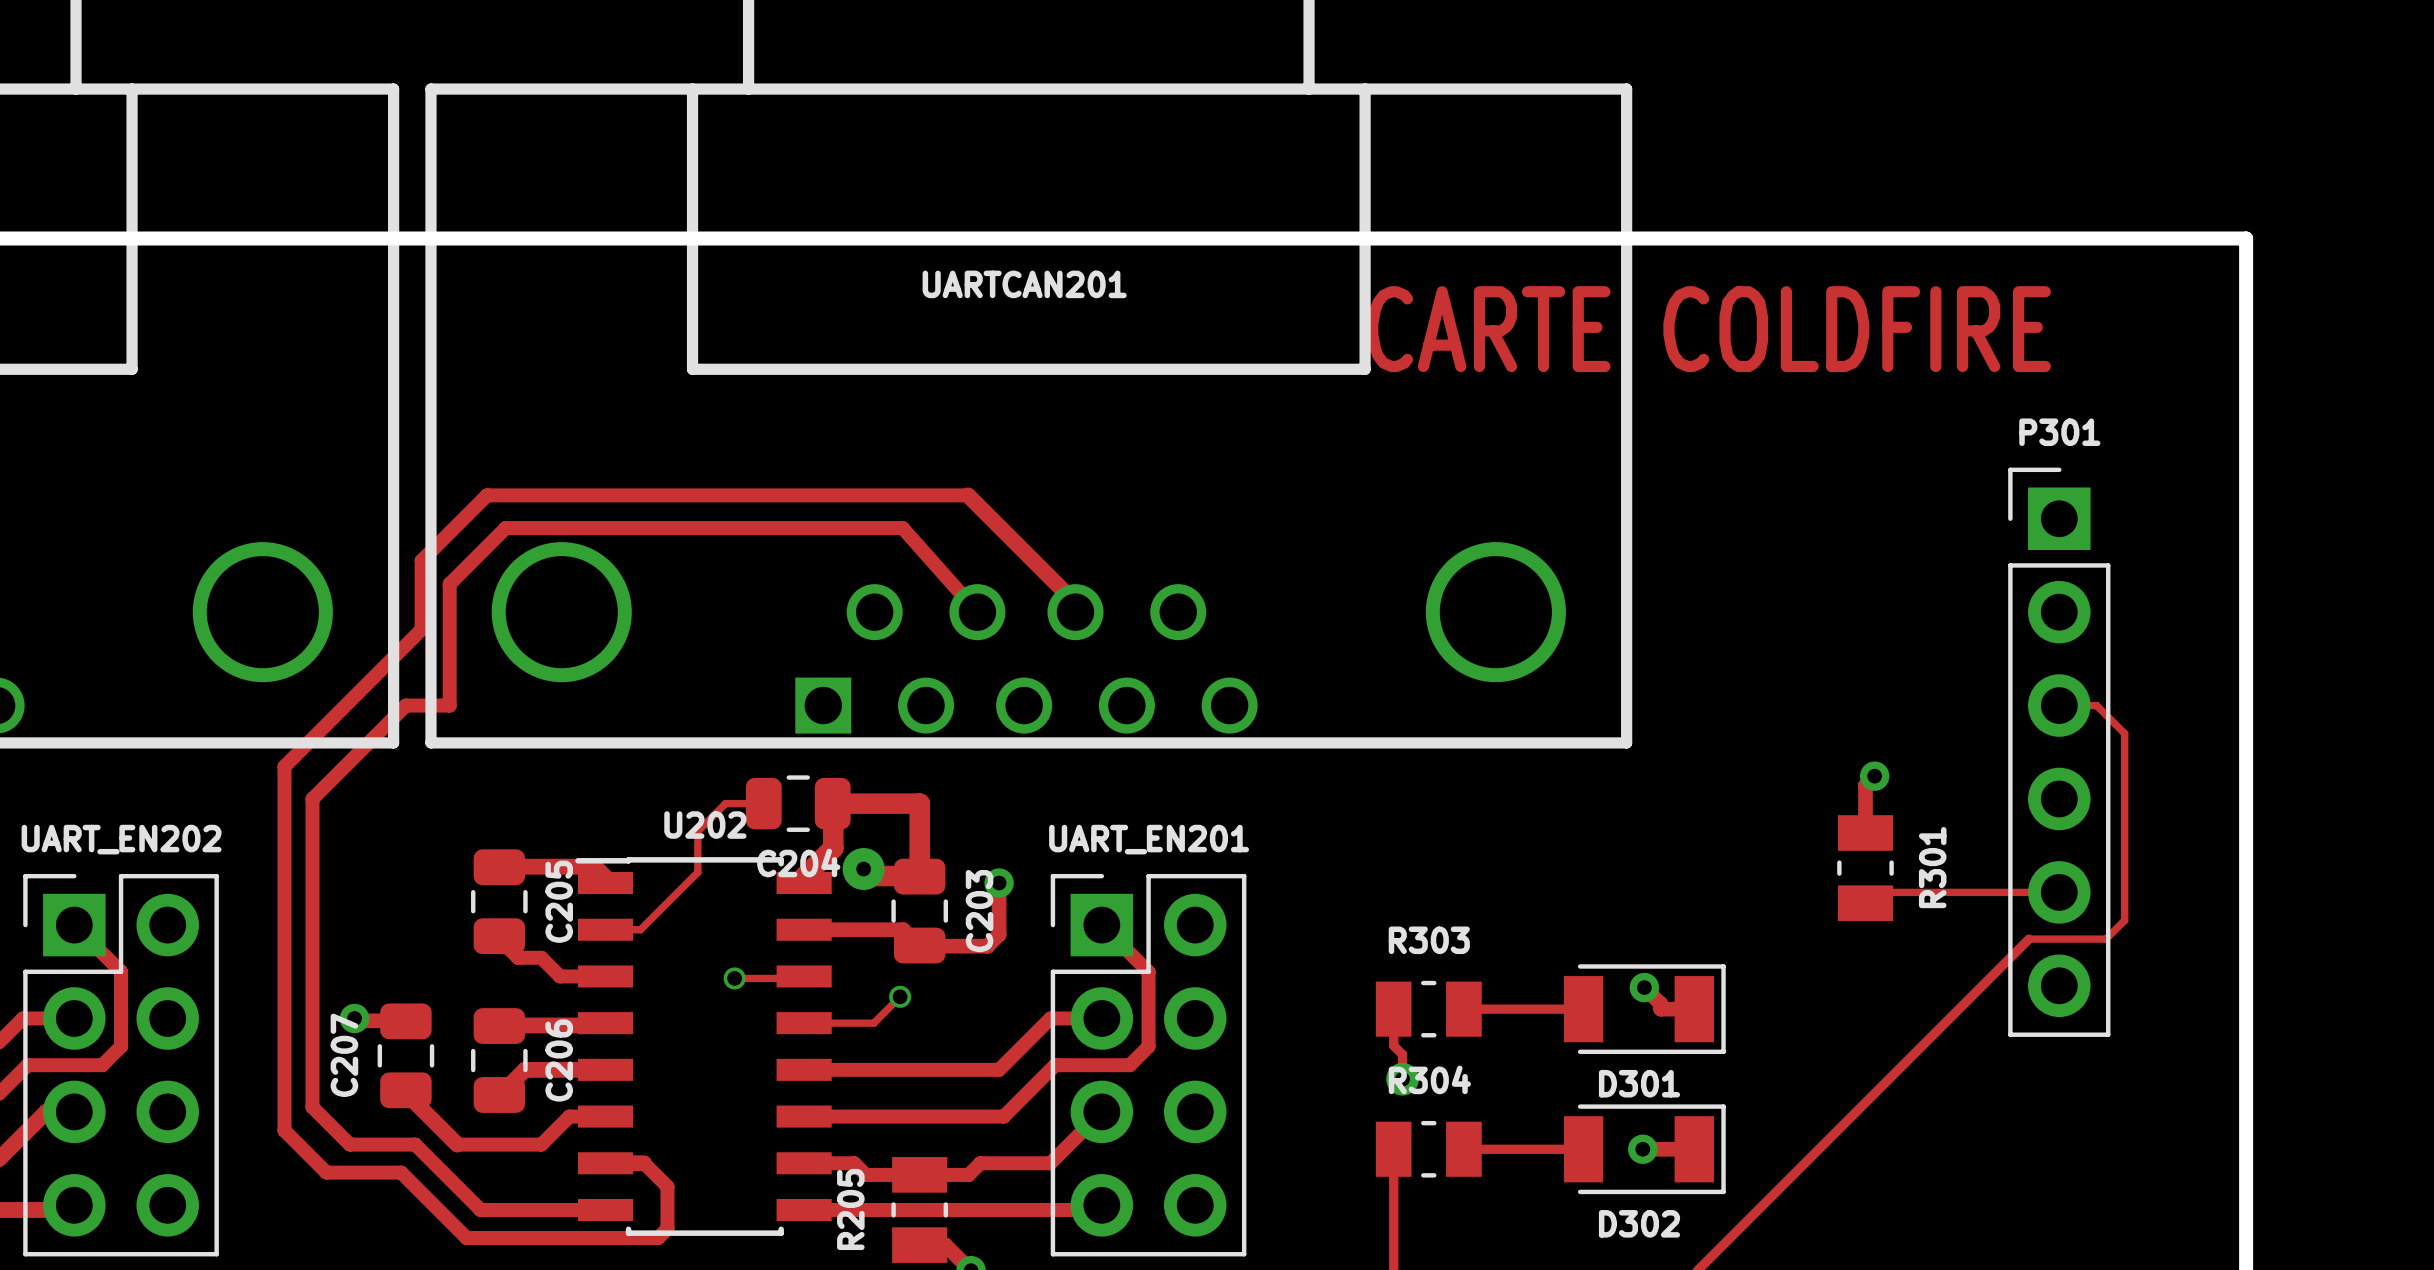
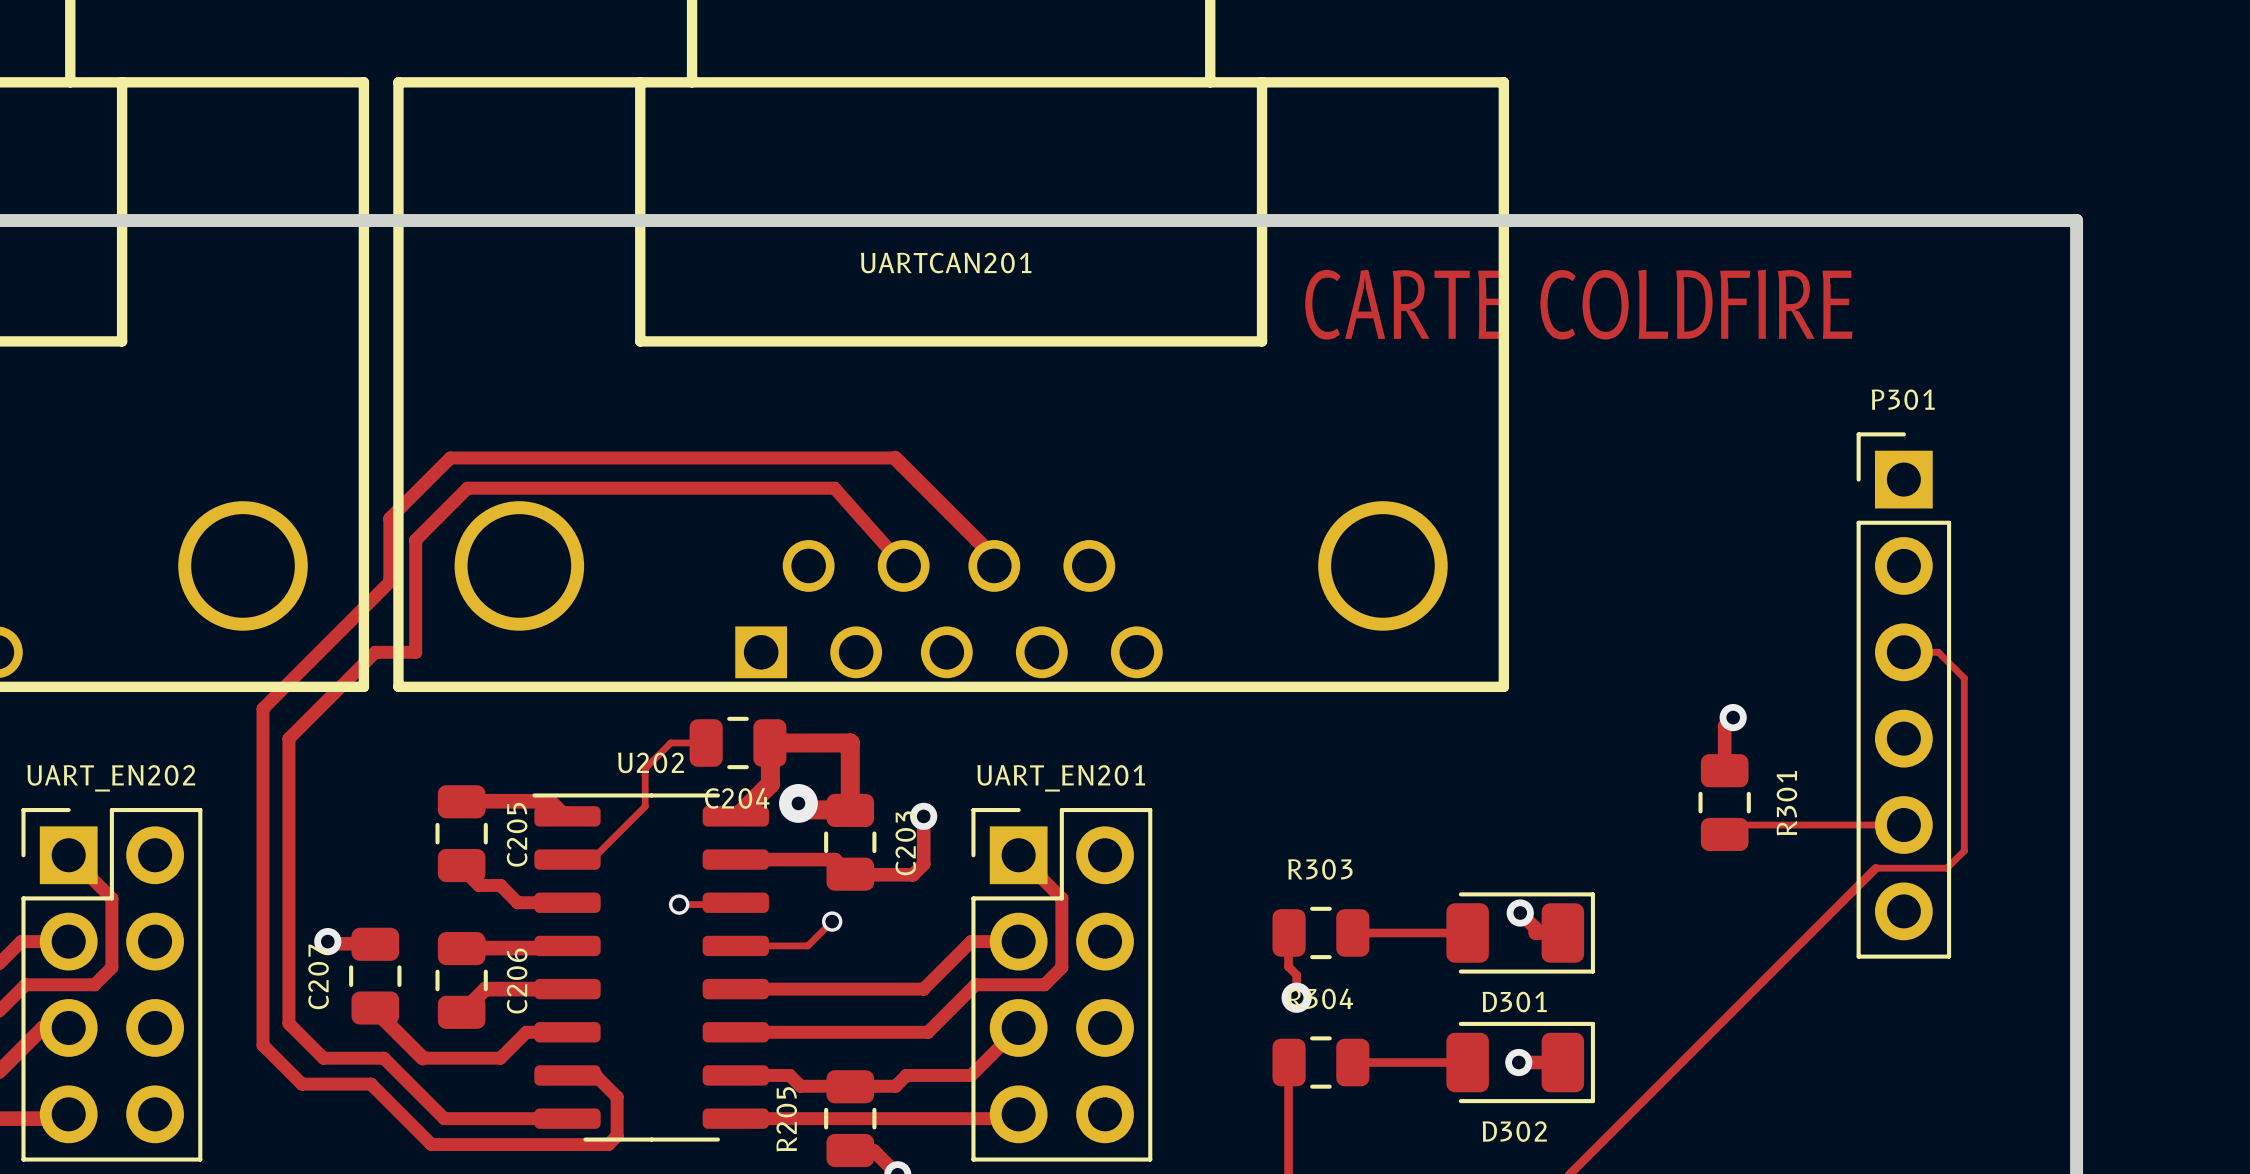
R301 footprint: [1837, 815, 1894, 922] -> [1698, 754, 1751, 852]
U202 footprint: [575, 857, 832, 1236] -> [532, 793, 769, 1142]
D301 footprint: [1563, 964, 1726, 1055] -> [1446, 892, 1595, 974]
R303 footprint: [1375, 980, 1482, 1038] -> [1272, 906, 1370, 960]
D302 footprint: [1563, 1104, 1726, 1195] -> [1446, 1021, 1595, 1104]
R304 footprint: [1375, 1120, 1482, 1178] -> [1272, 1036, 1370, 1089]
R205 footprint: [891, 1157, 949, 1263] -> [824, 1070, 877, 1168]

